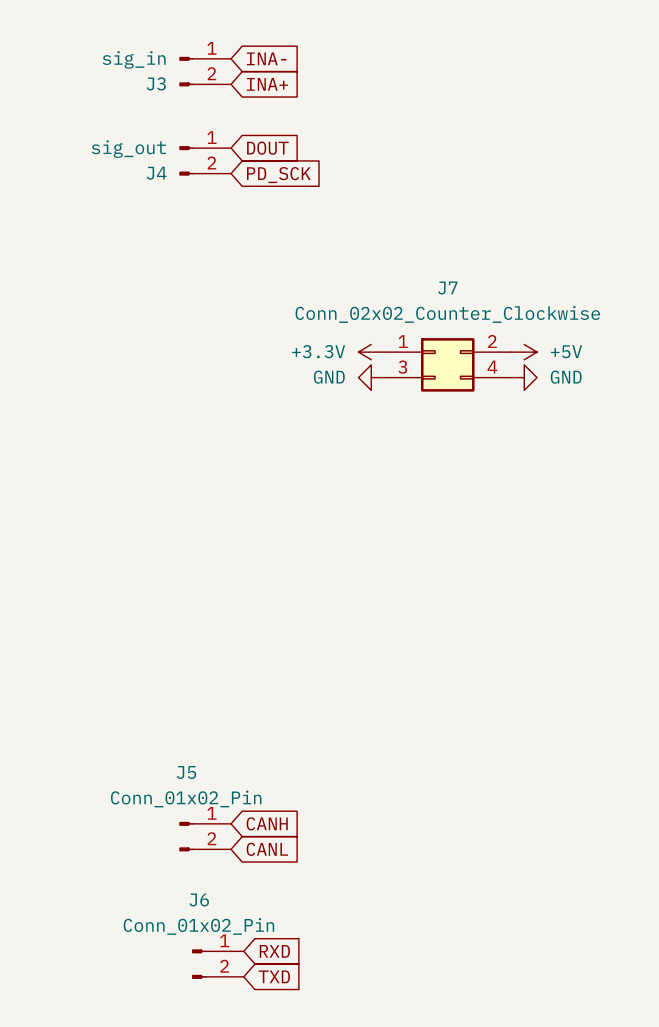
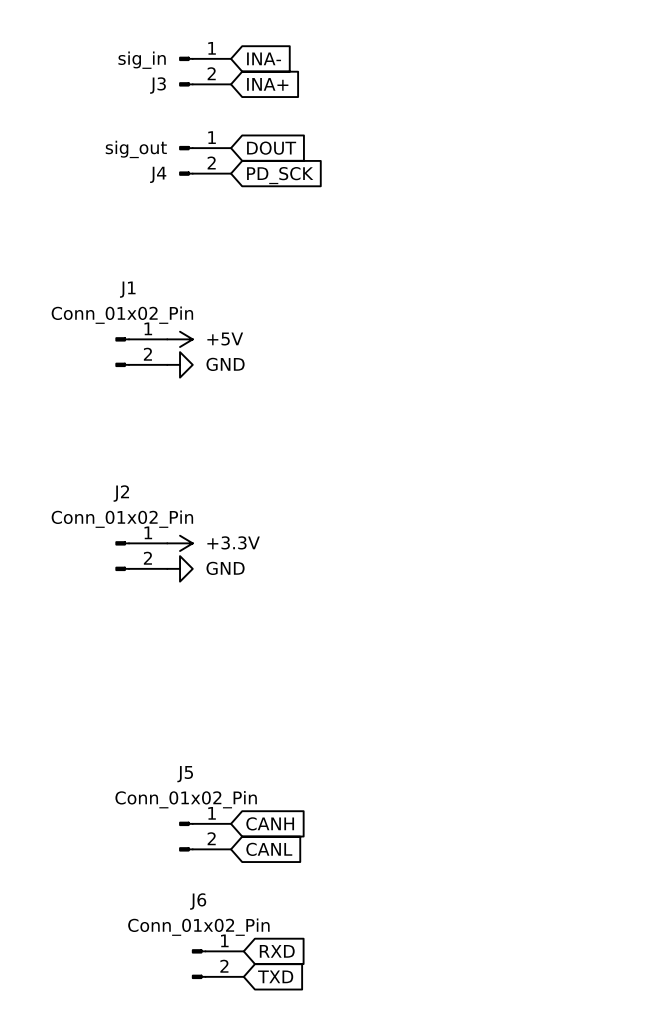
power symbol: none -> +5V (180, 339)
J1: none -> Conn_01x02_Pin (141, 352)
power symbol: +3.3V (371, 352) -> none
power symbol: +5V (524, 352) -> none
power symbol: none -> GND (180, 364)
J7: Conn_02x02_Counter_Clockwise (447, 364) -> none
power symbol: GND (371, 377) -> none
power symbol: GND (524, 377) -> none
power symbol: none -> +3.3V (180, 543)
J2: none -> Conn_01x02_Pin (141, 556)
power symbol: none -> GND (180, 568)

